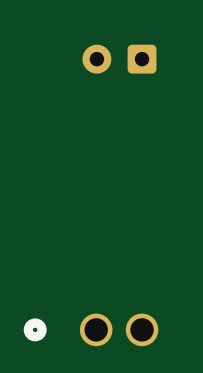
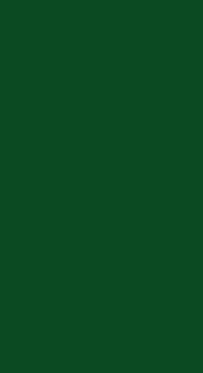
part: (119, 59) -> none
part: (91, 329) -> none

